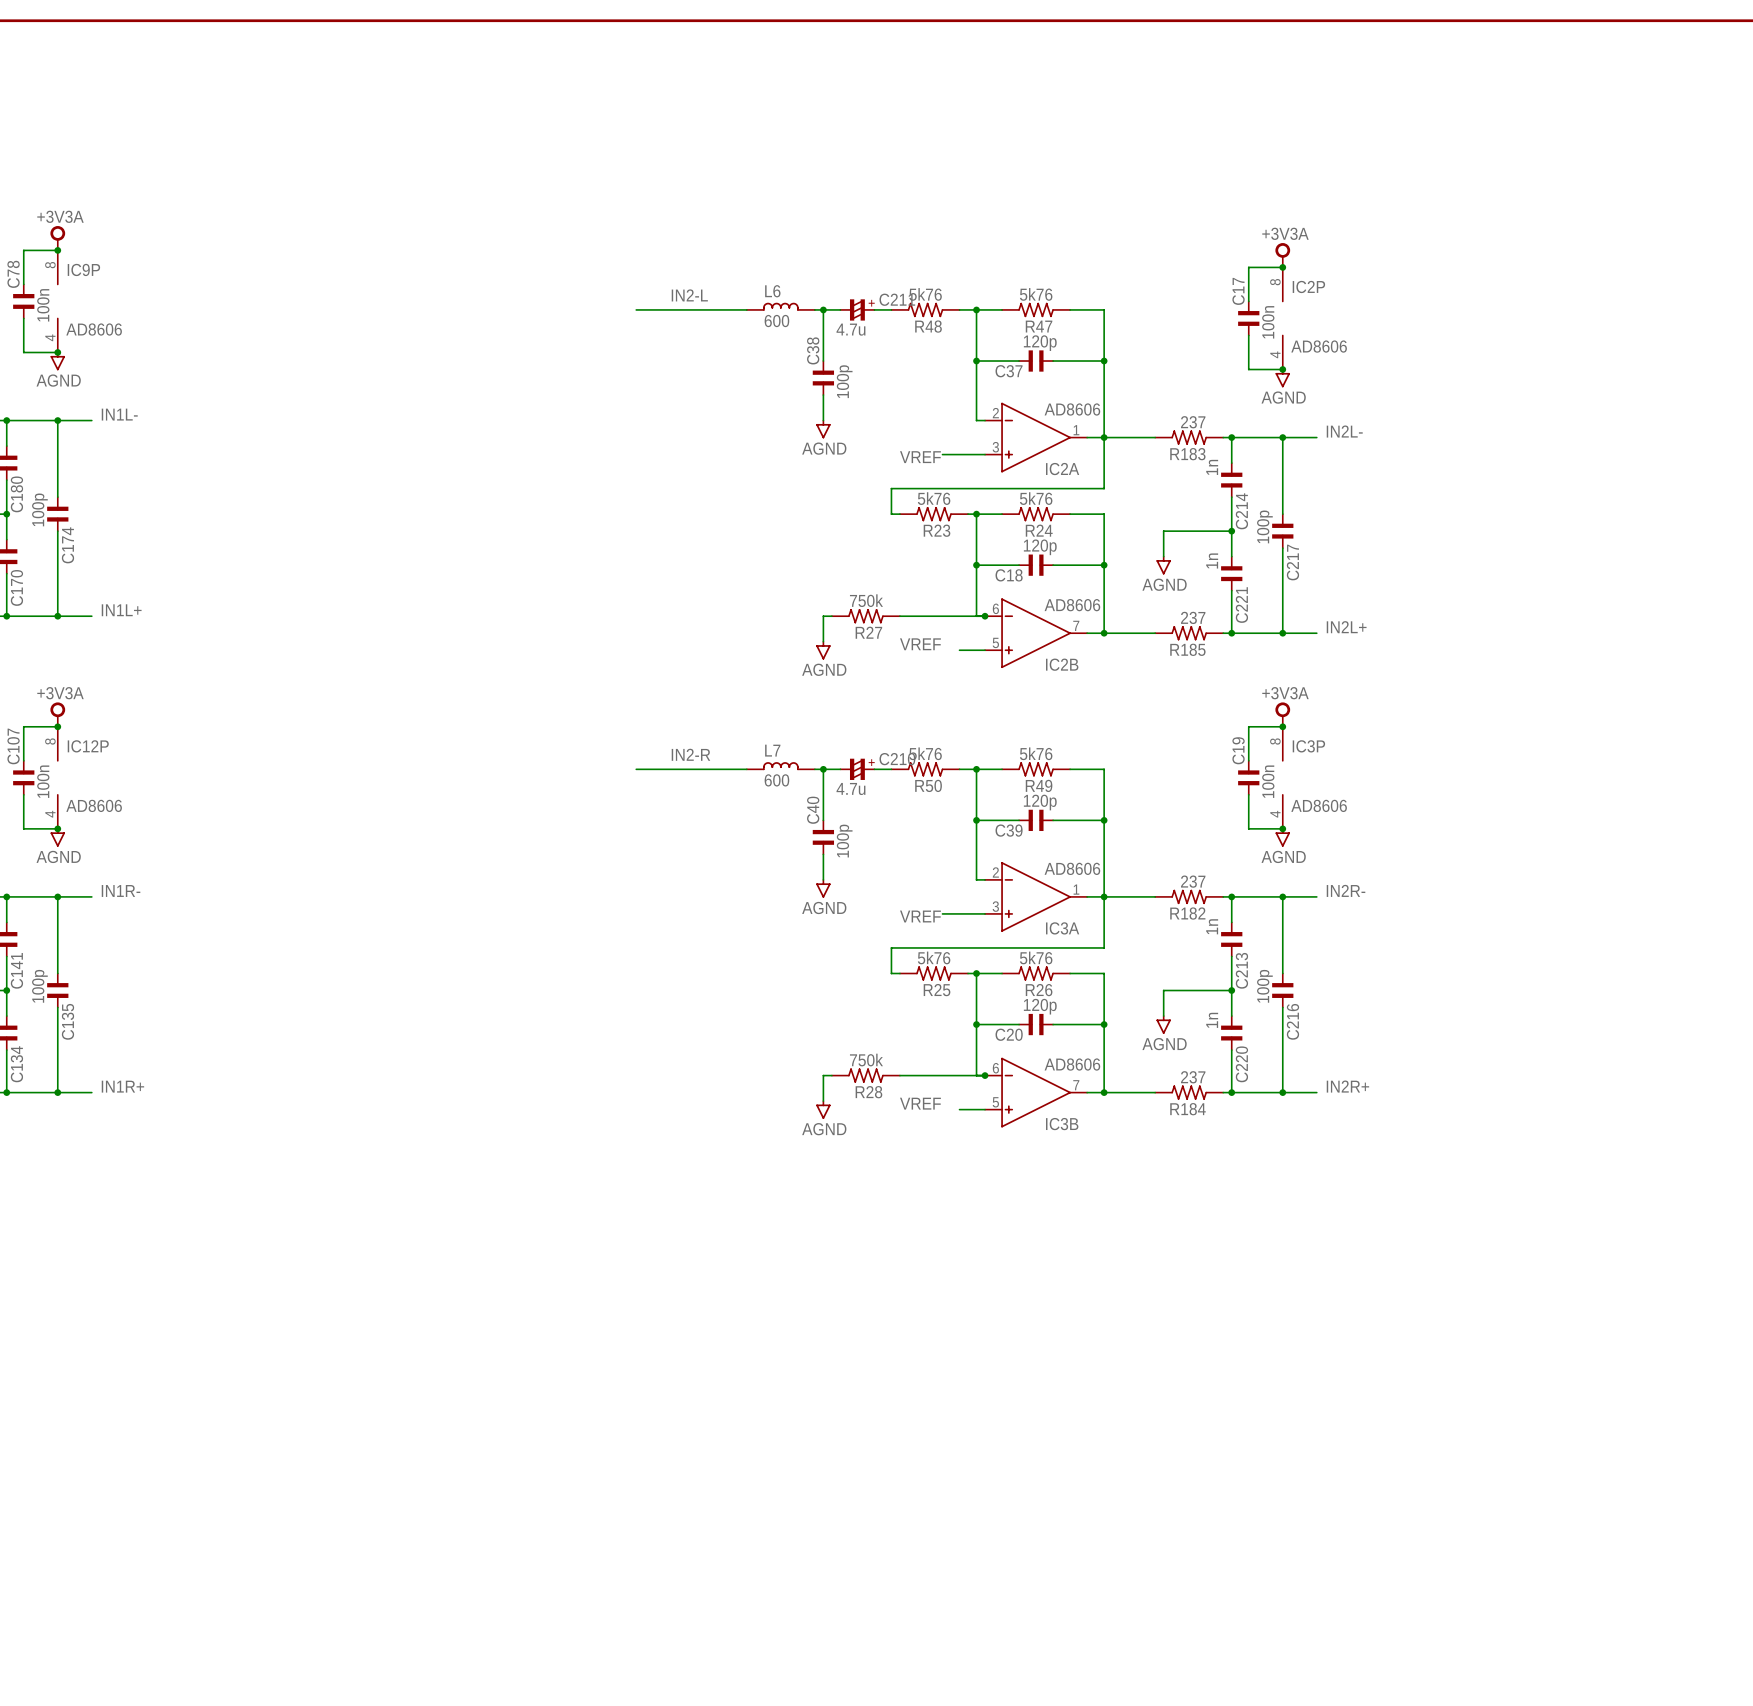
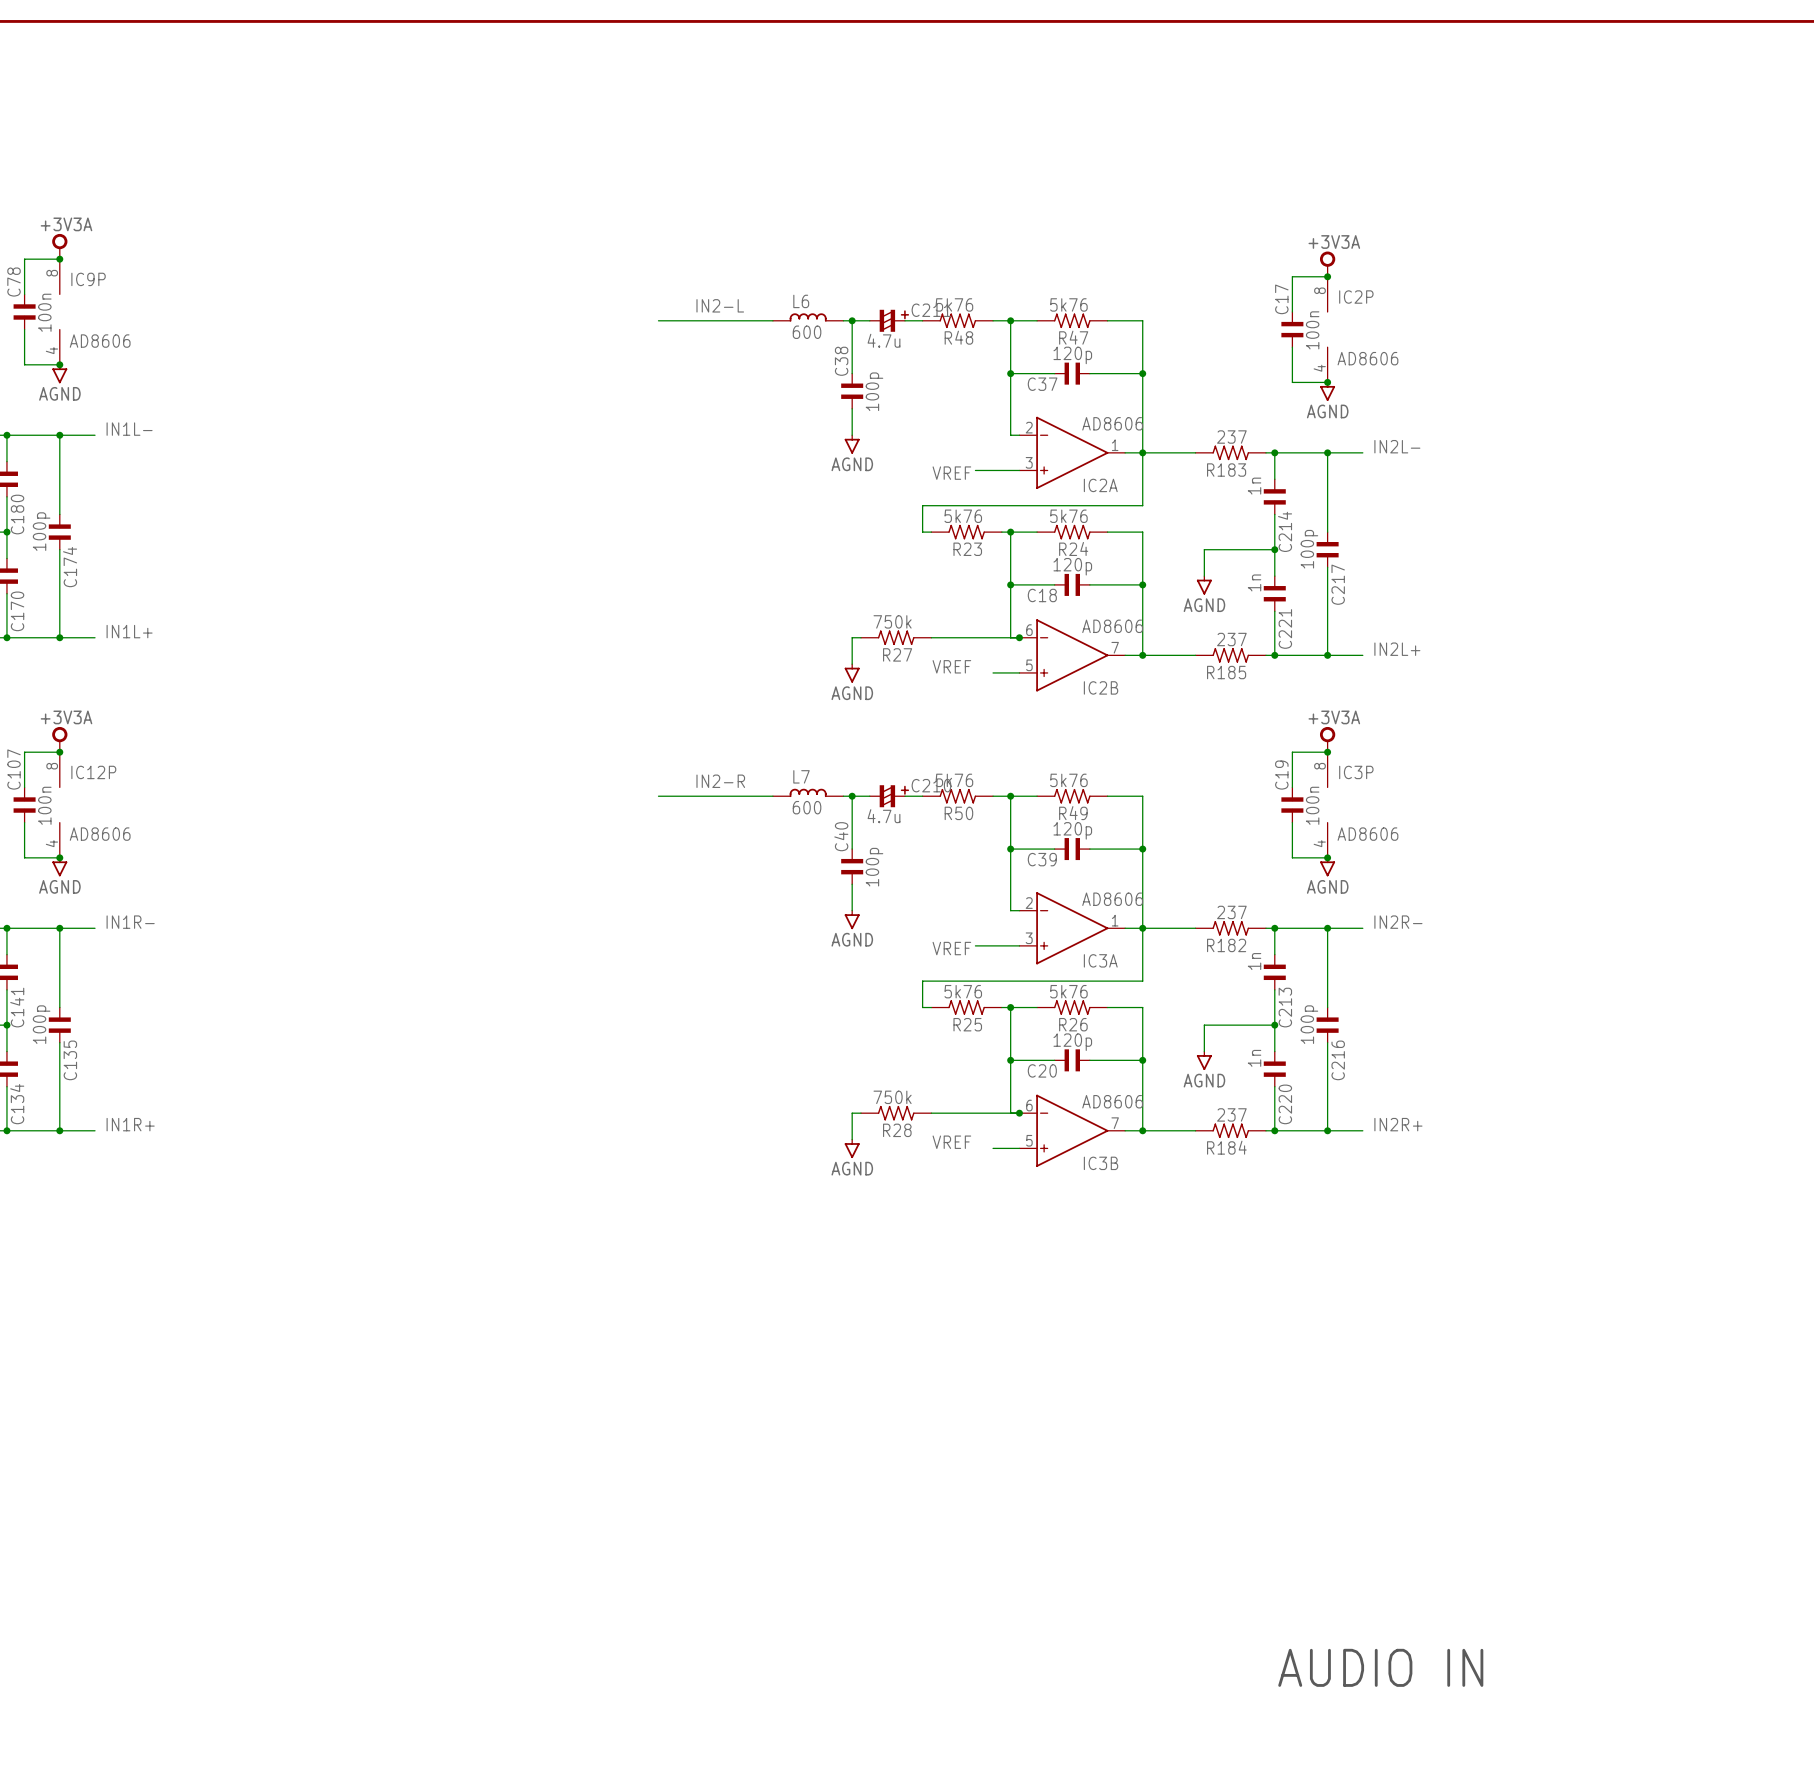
text: none -> AUDIO IN (1380, 1667)

